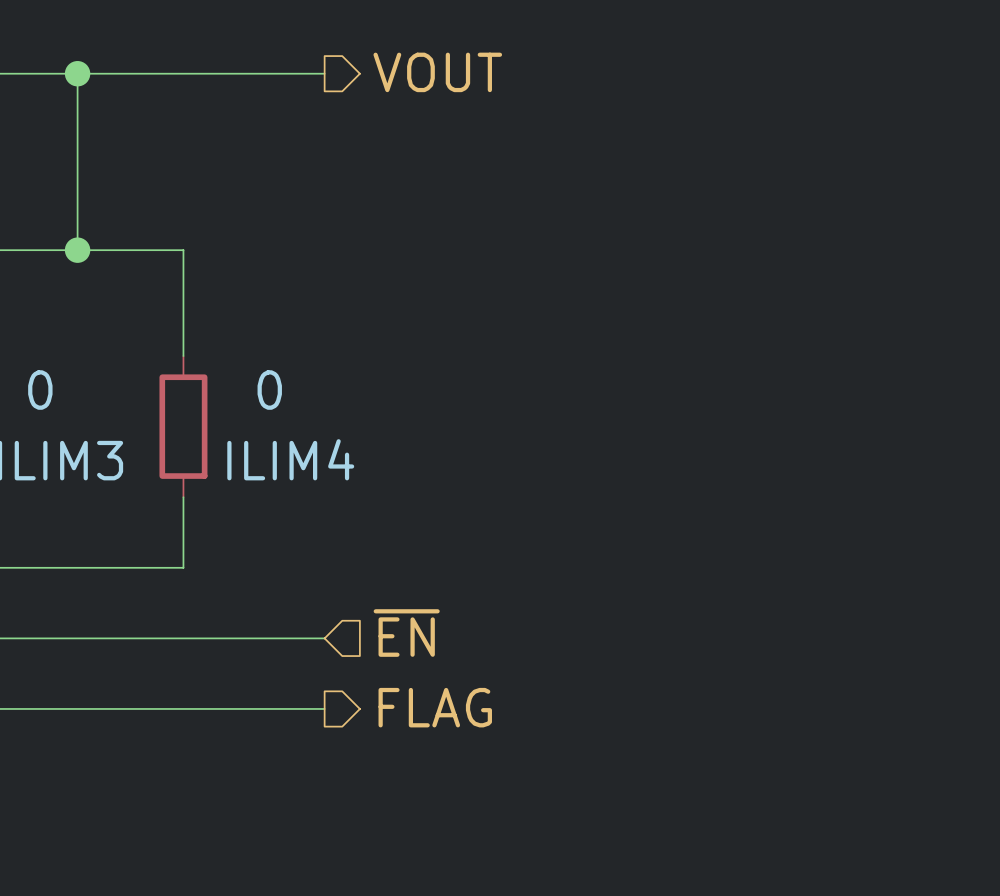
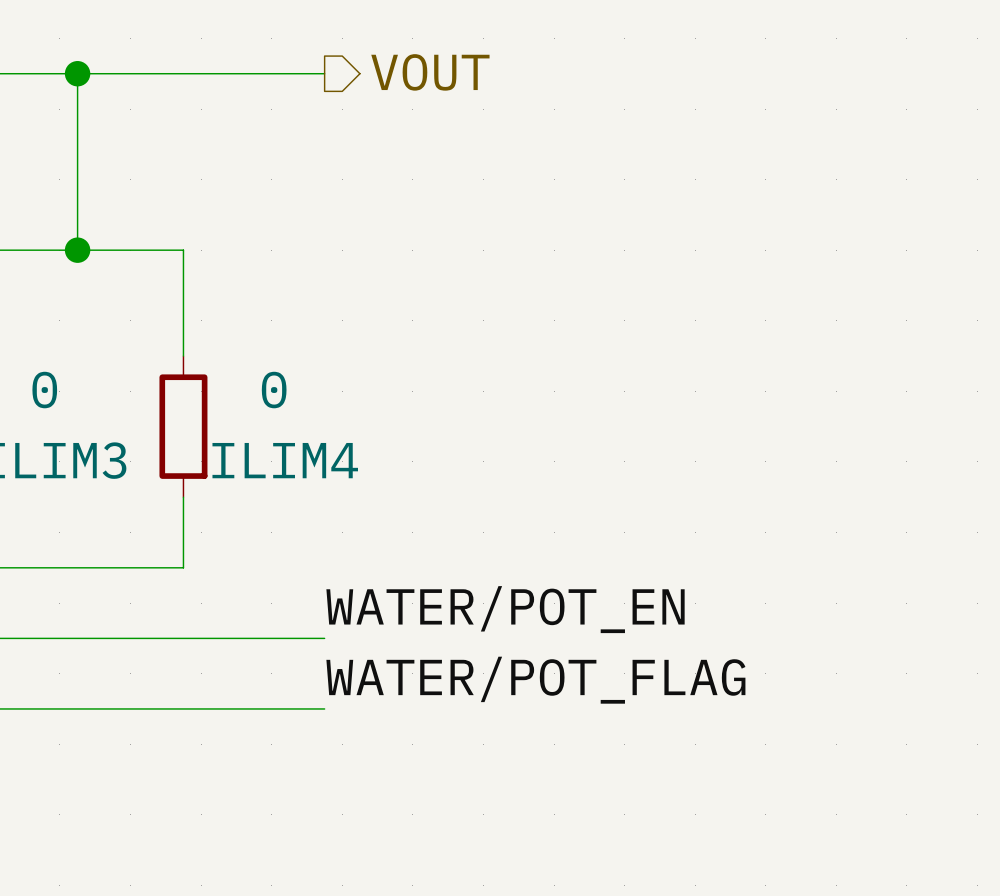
label: none -> WATER/POT_EN (505, 609)
hierarchical label: ~{EN} (406, 633) -> none
label: none -> WATER/POT_FLAG (535, 680)
hierarchical label: FLAG (435, 707) -> none

